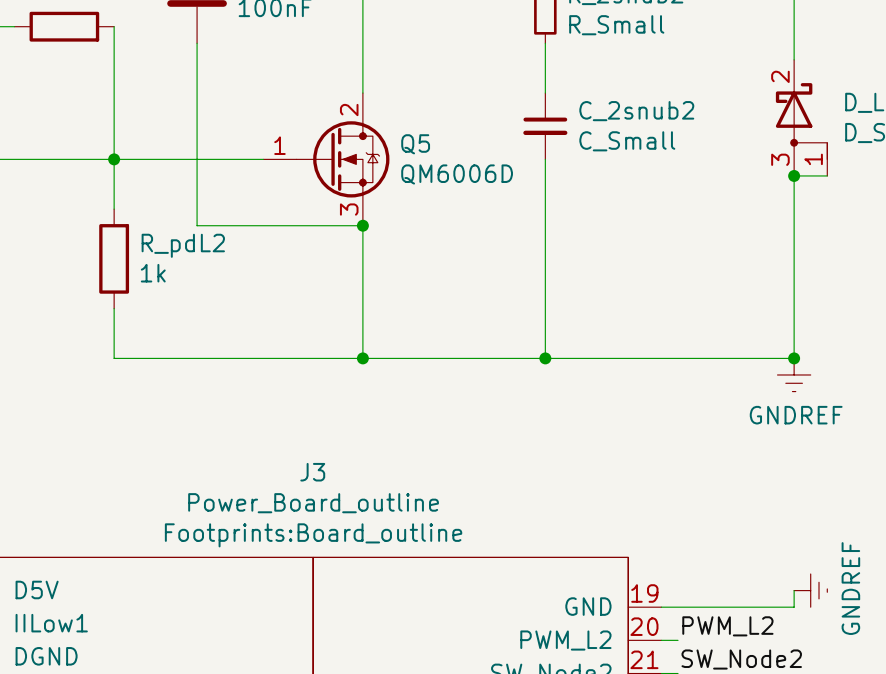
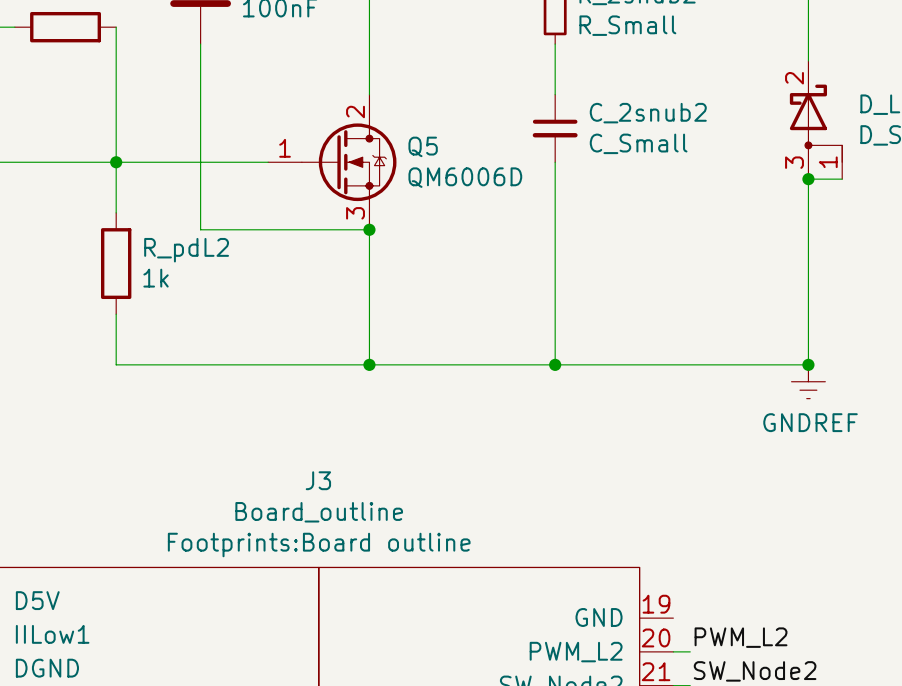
J3 value: Power_Board_outline (313, 503) -> Board_outline (319, 512)
J3 text: Footprints:Board_outline (313, 535) -> Footprints:Board outline (319, 545)
wire: (794, 590) (794, 607) (661, 607) -> none
power symbol: GNDREF (810, 590) -> none

